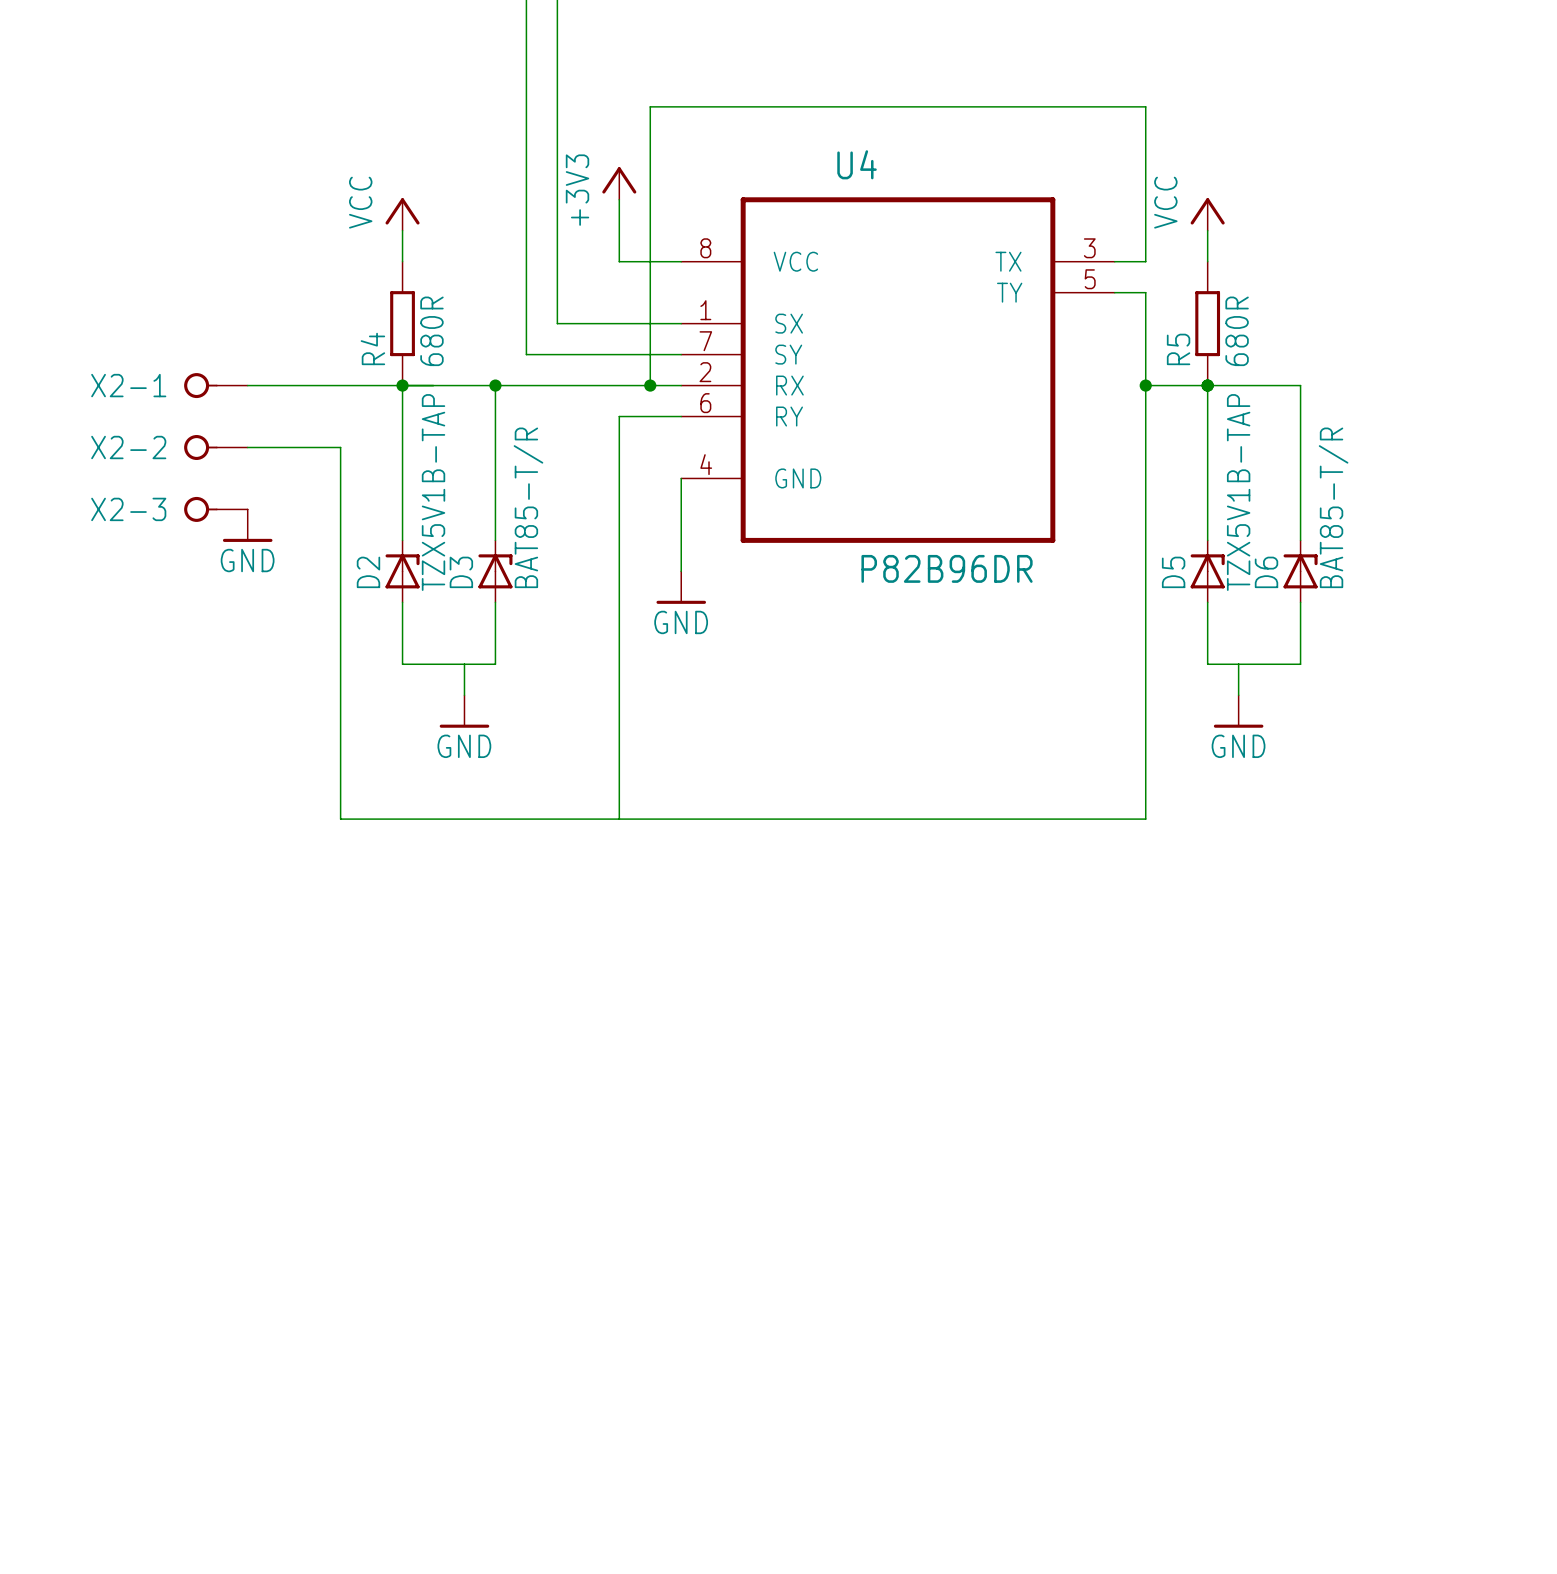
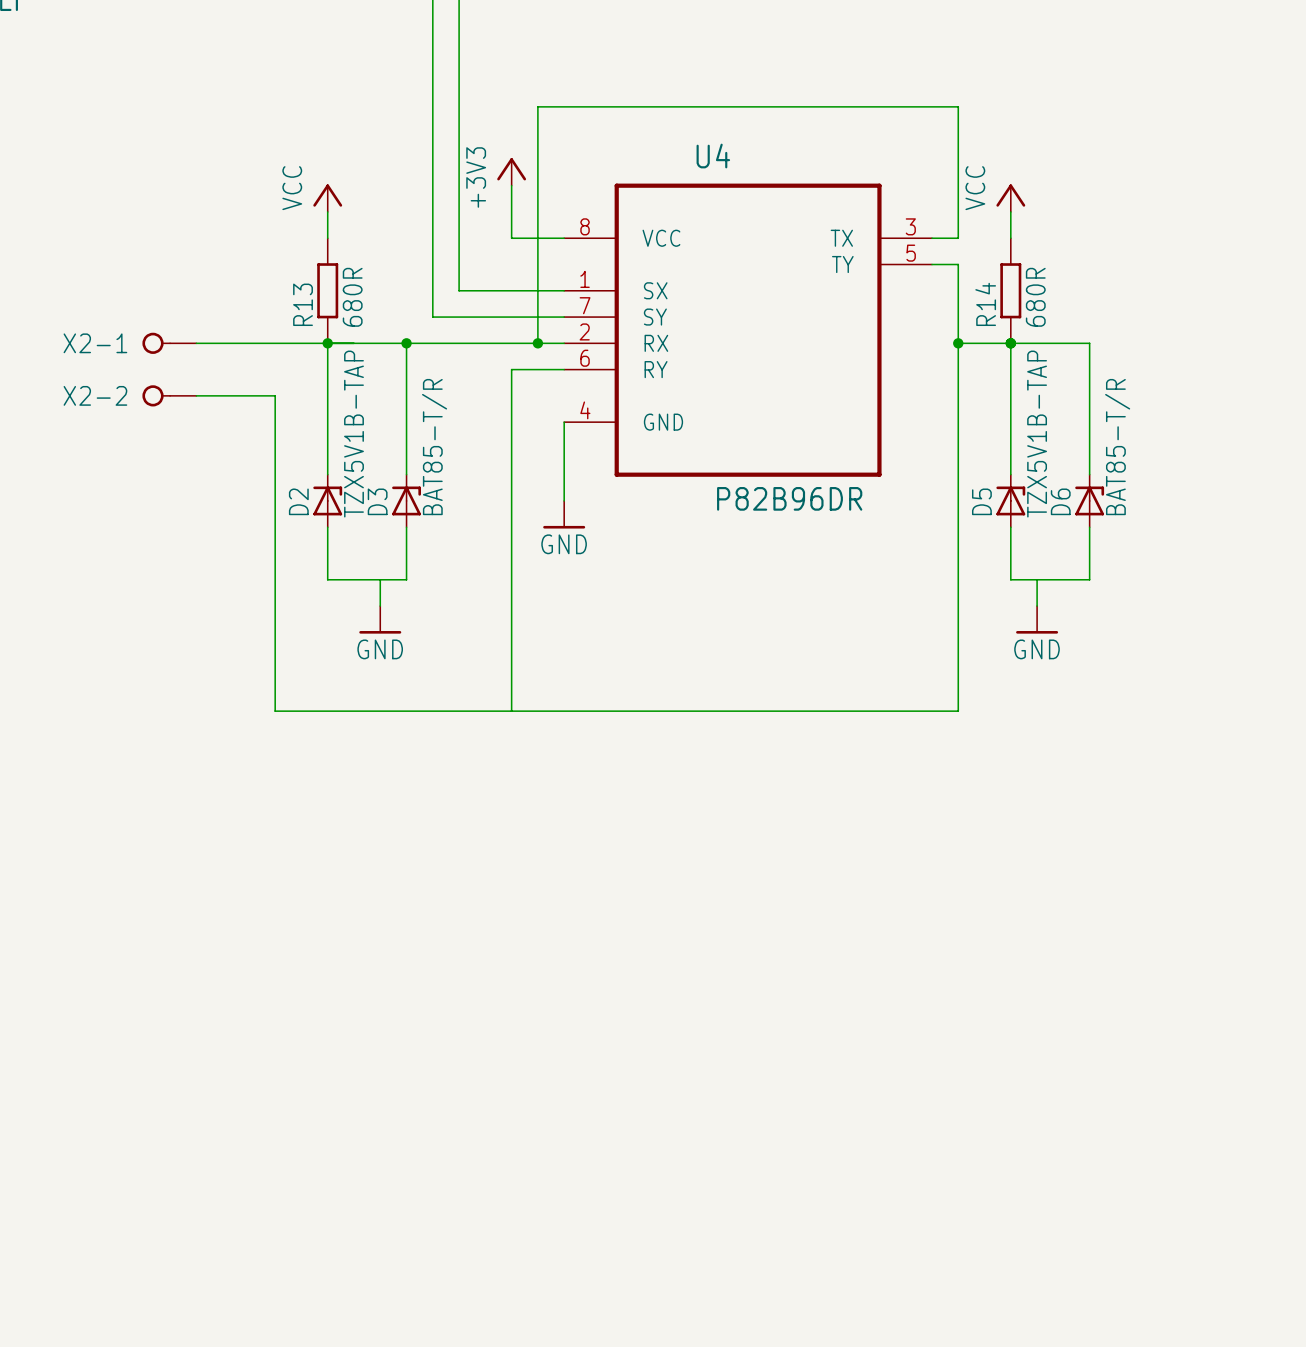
R4 name: R4 (372, 348) -> R13 (303, 304)
R5 name: R5 (1178, 349) -> R14 (985, 304)
X2-3: (215, 509) -> none
power symbol: GND (247, 525) -> none

